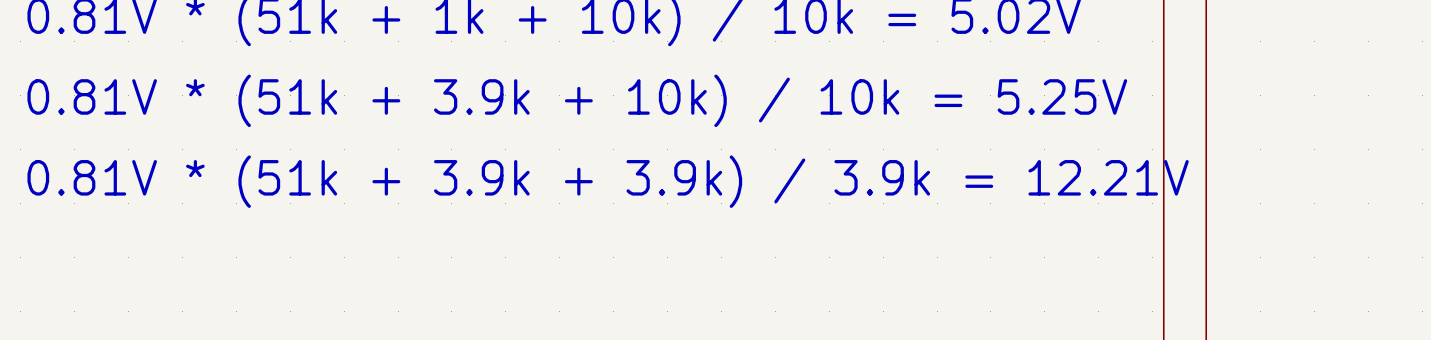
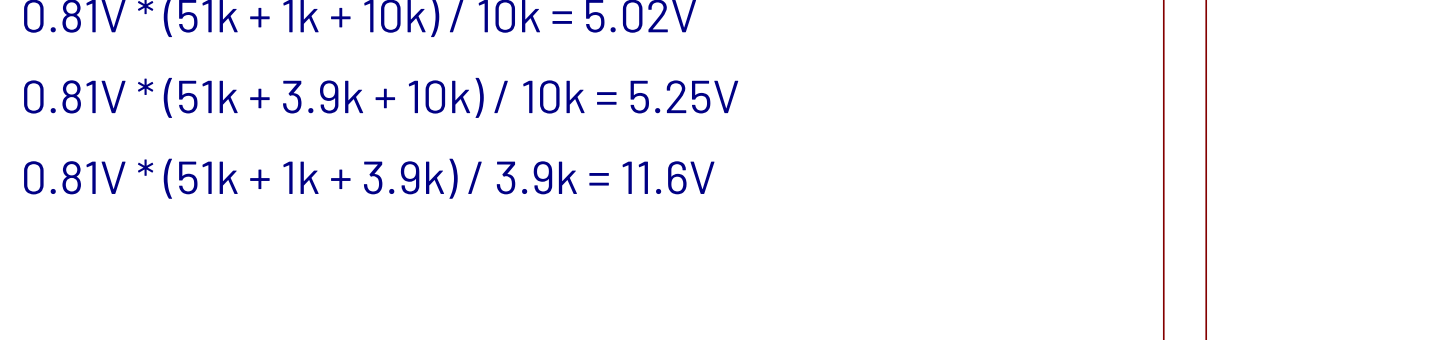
text: 0.81V * (51k + 3.9k + 3.9k) / 3.9k = 12.21V (608, 181) -> 0.81V * (51k + 1k + 3.9k) / 3.9k = 11.6V (369, 178)

